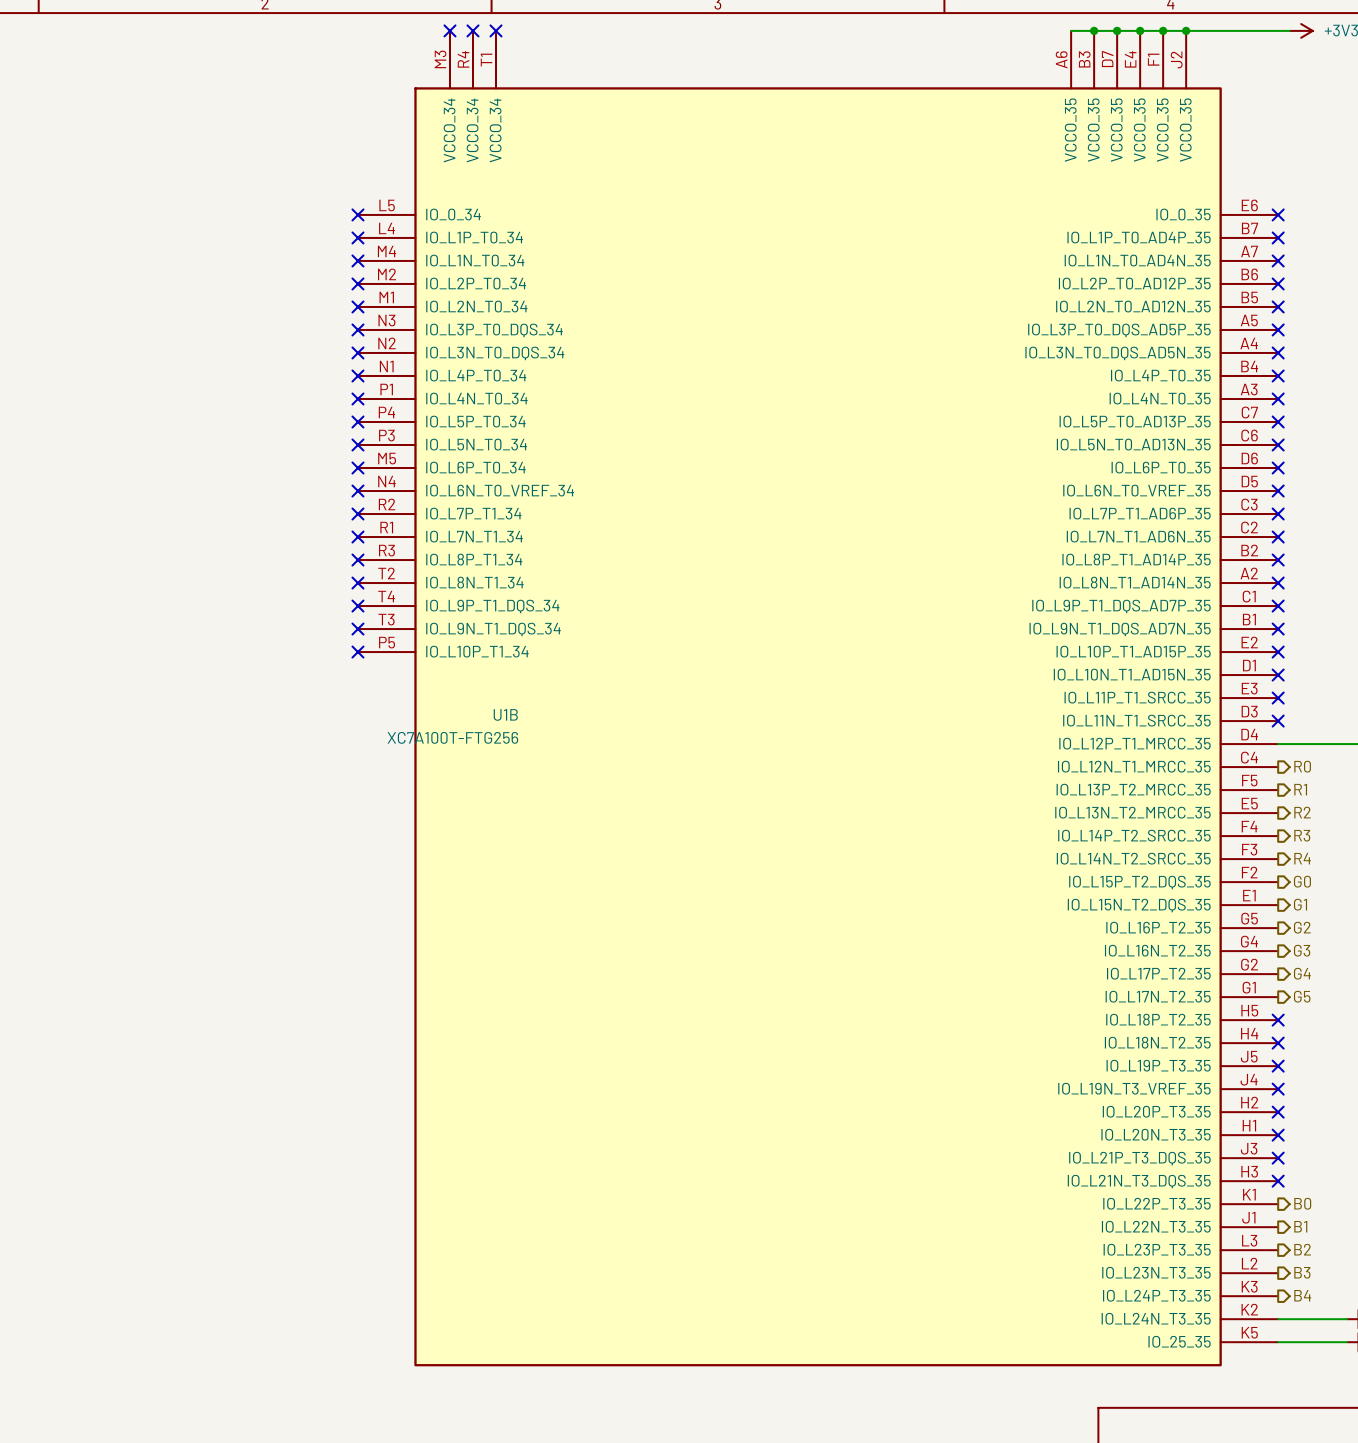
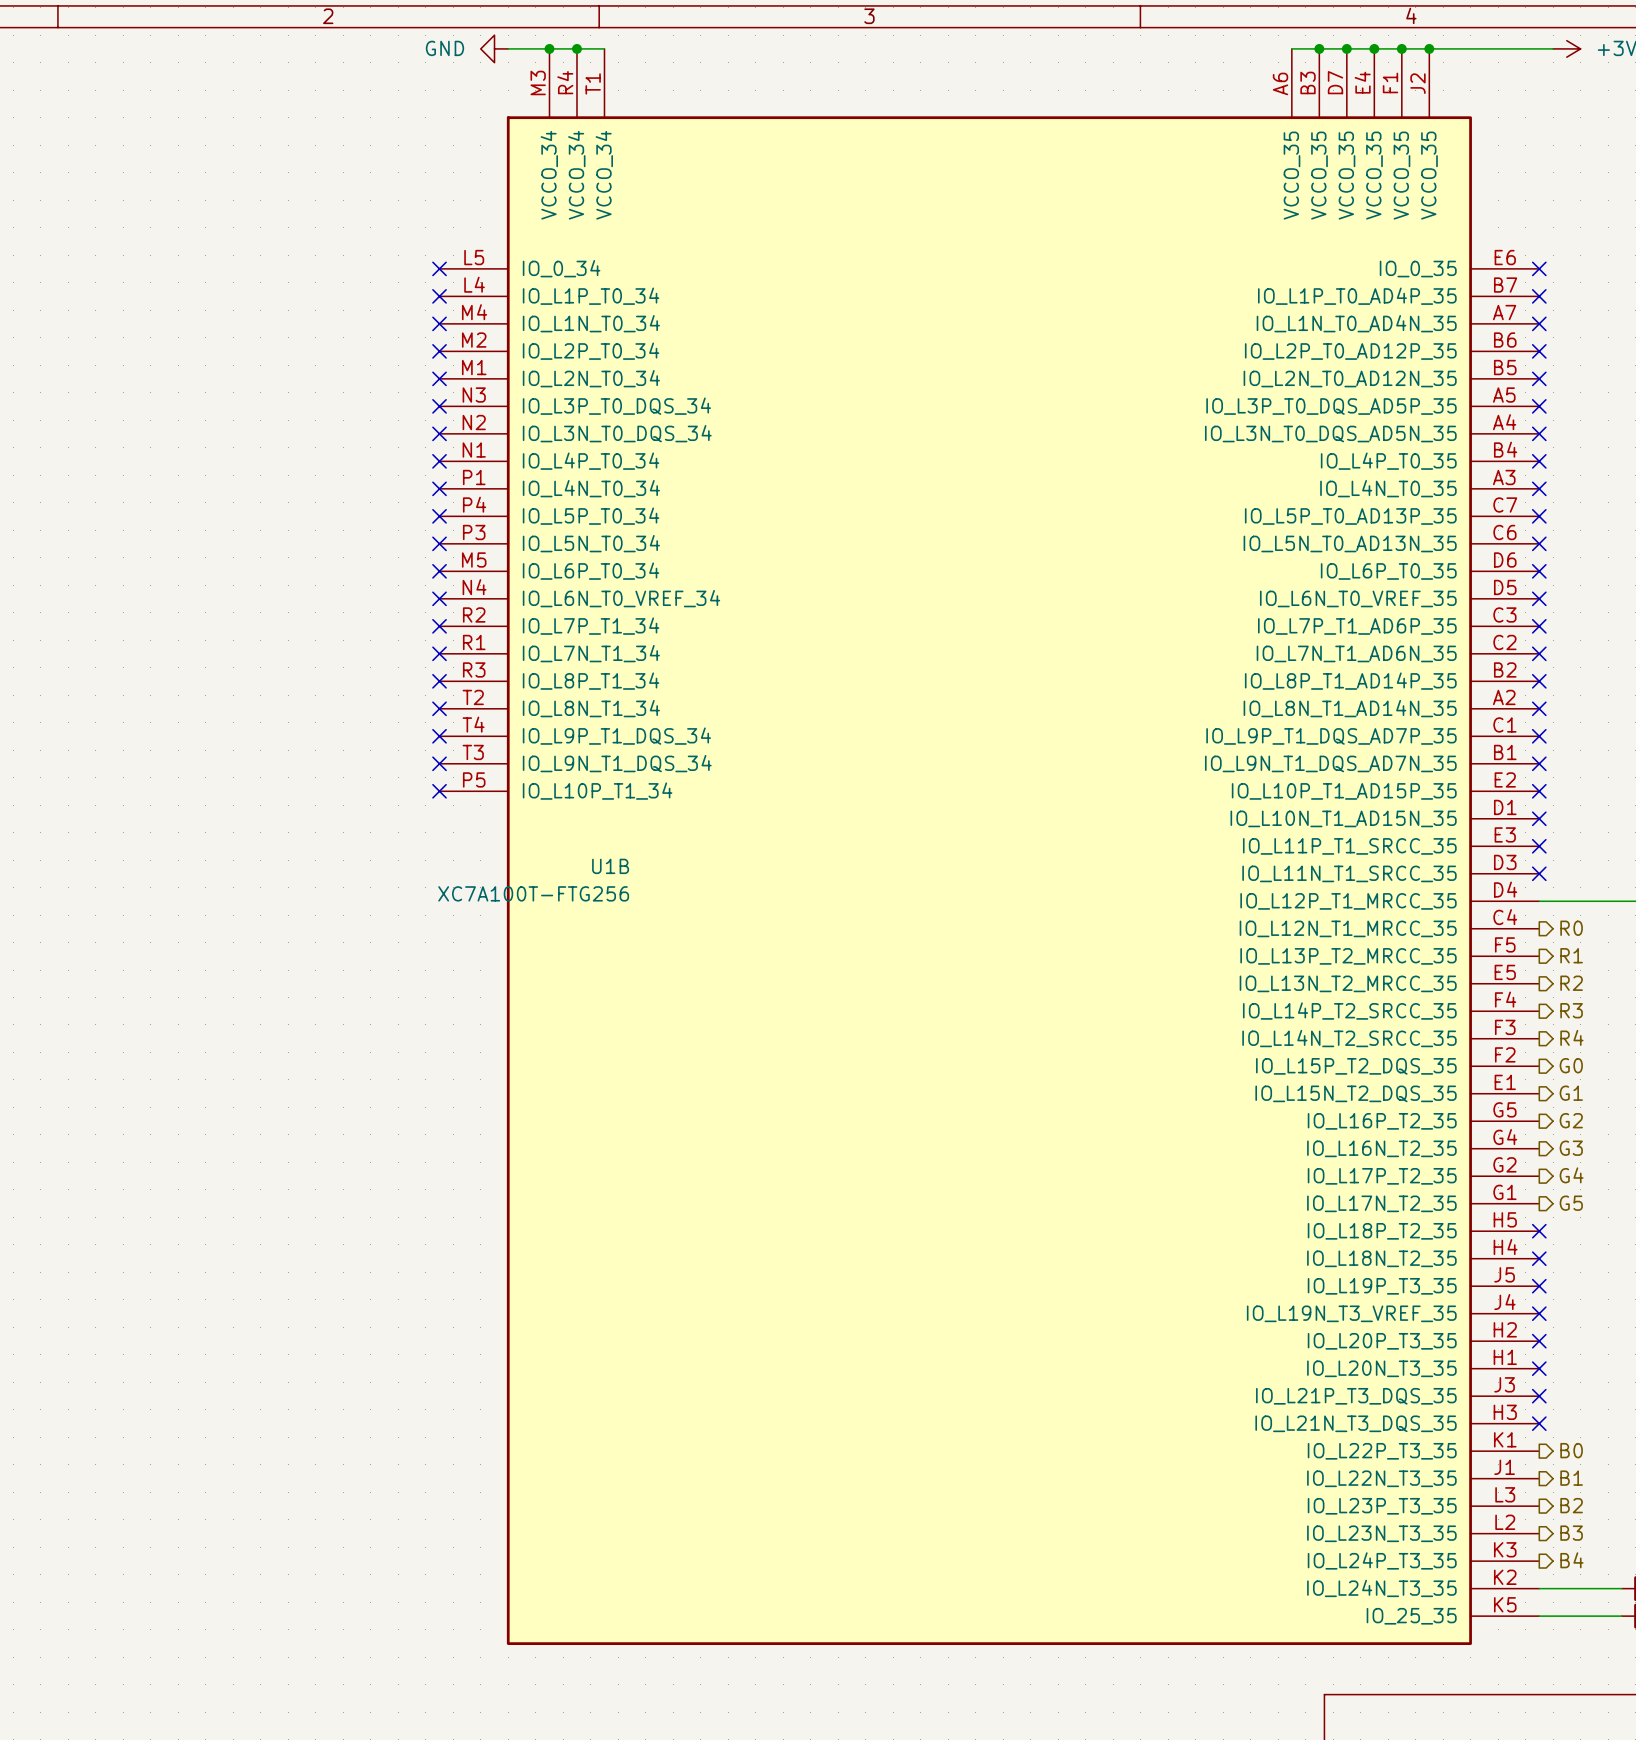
power symbol: none -> GND (494, 48)
wire: none -> (508, 48) (604, 48)
no-connect mark: (449, 30) -> none
junction: none -> (549, 48)
no-connect mark: (472, 30) -> none
junction: none -> (576, 48)
no-connect mark: (496, 30) -> none

